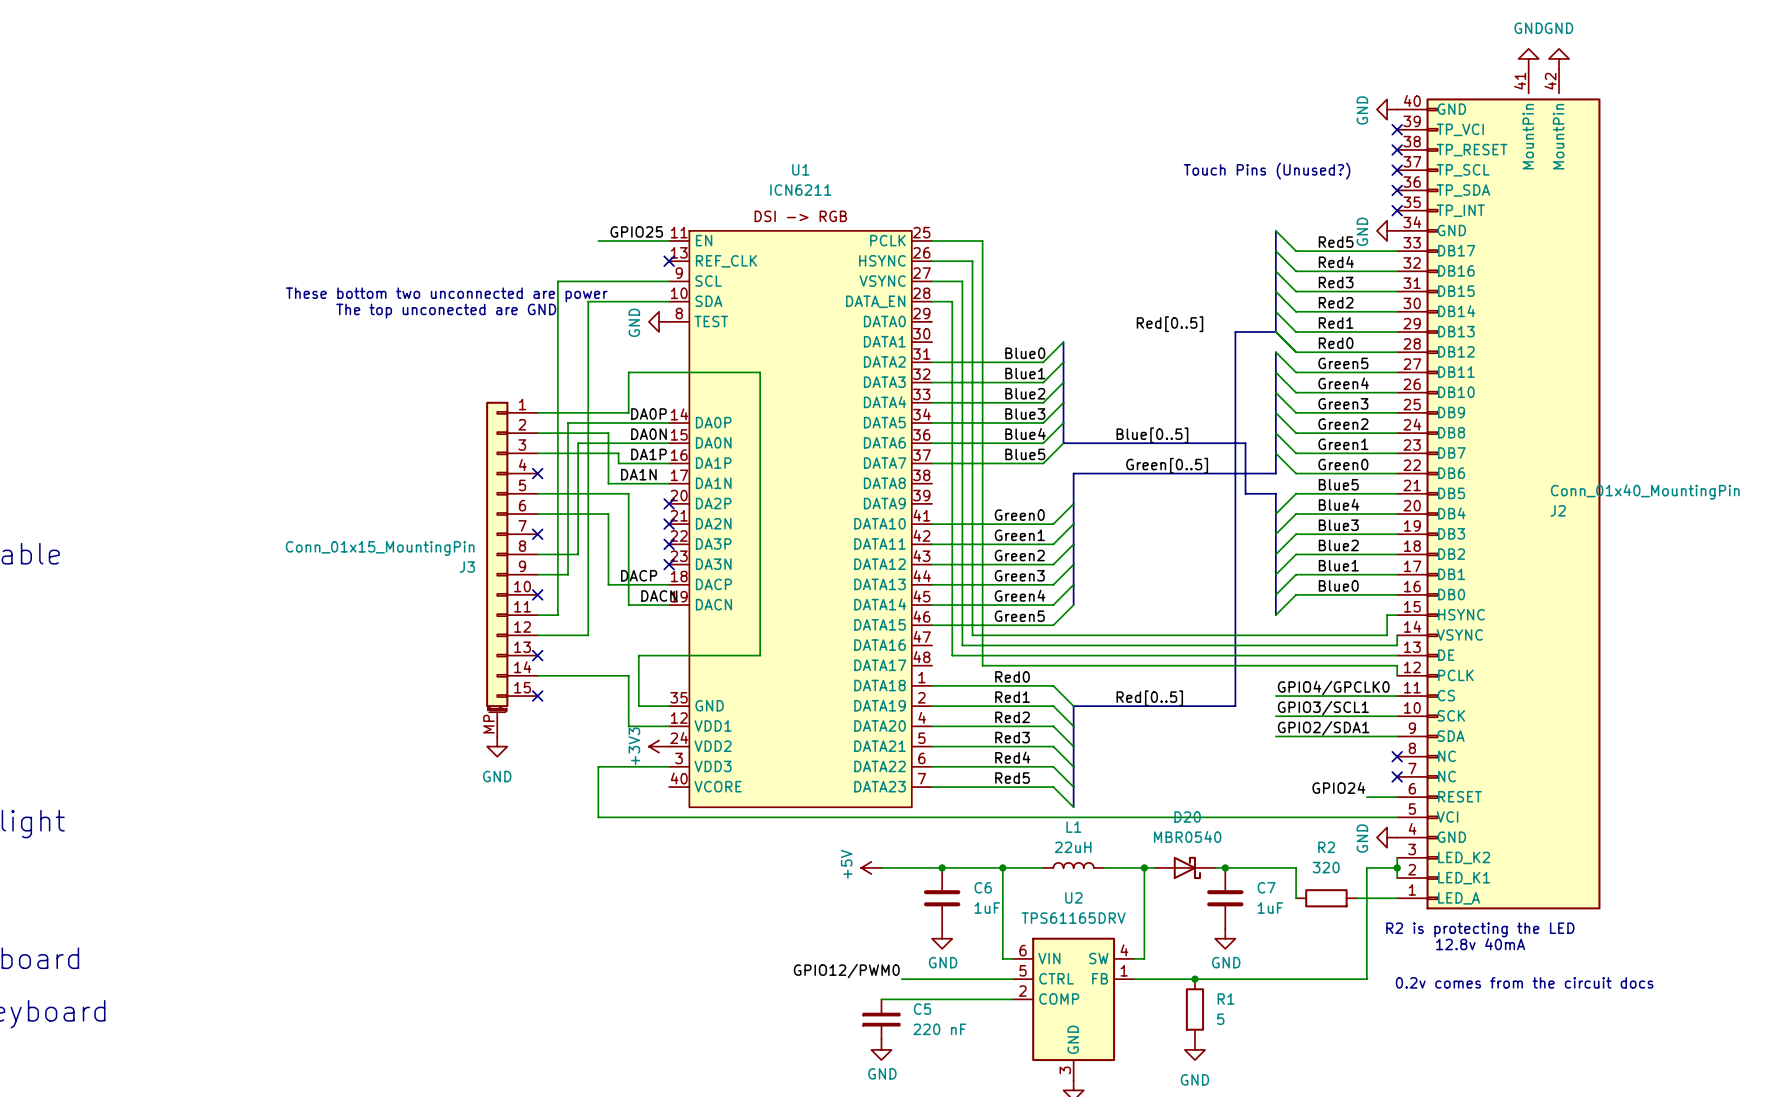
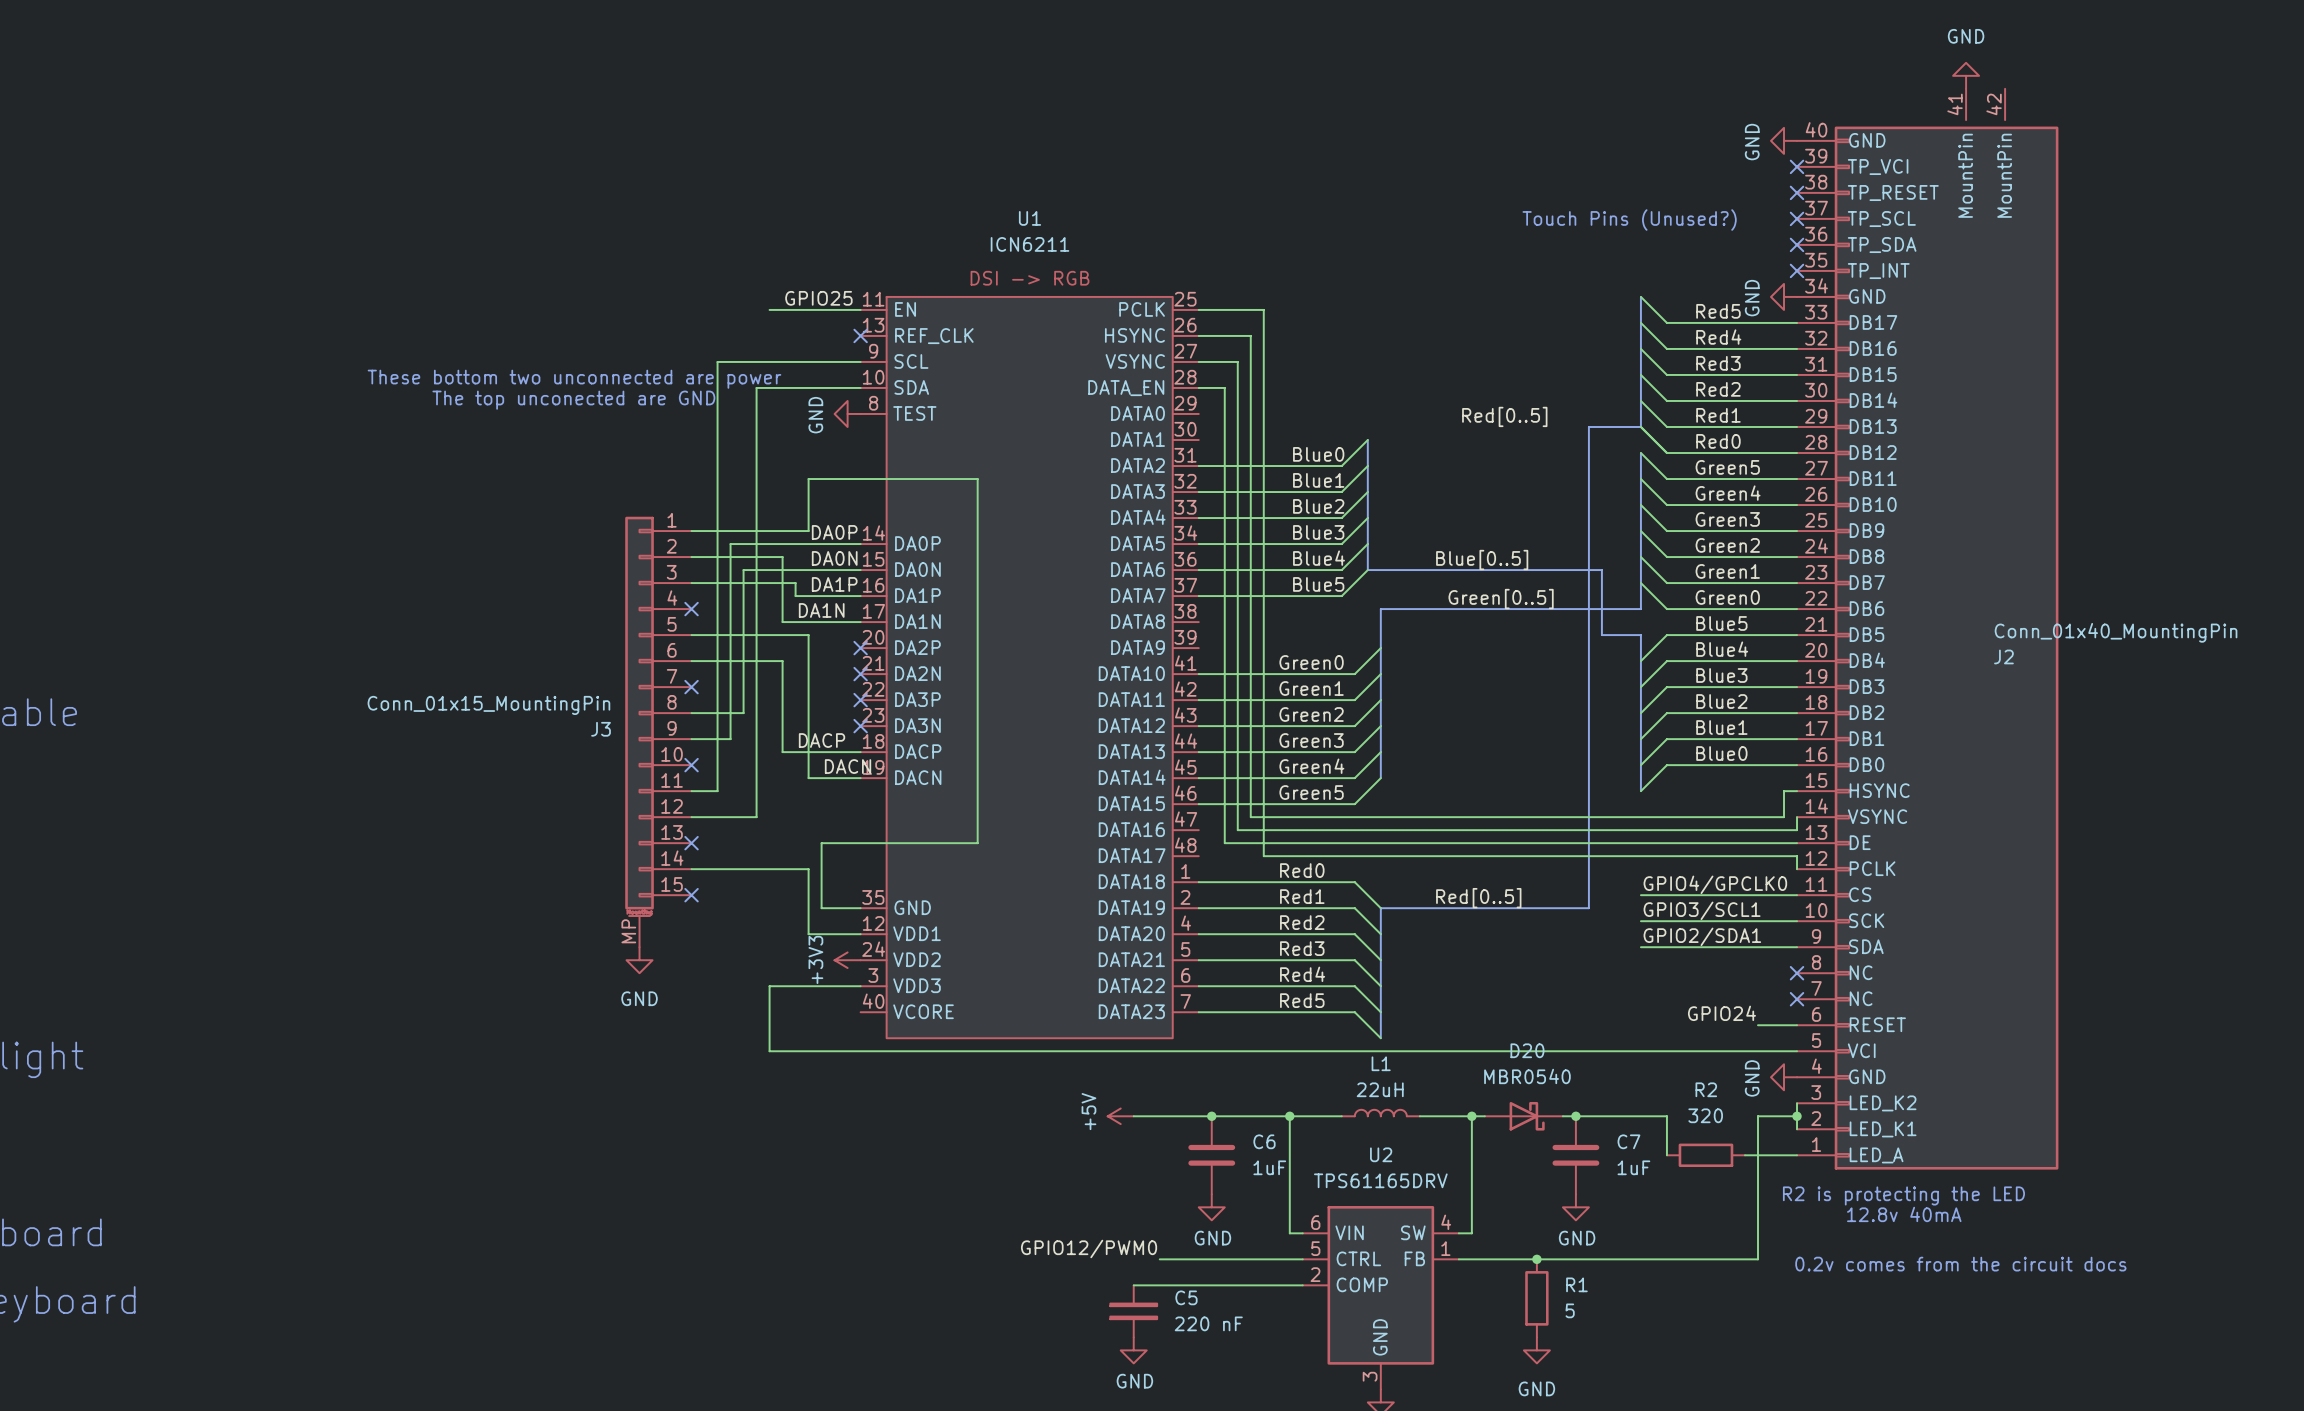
power symbol: GND (1559, 58) -> none

